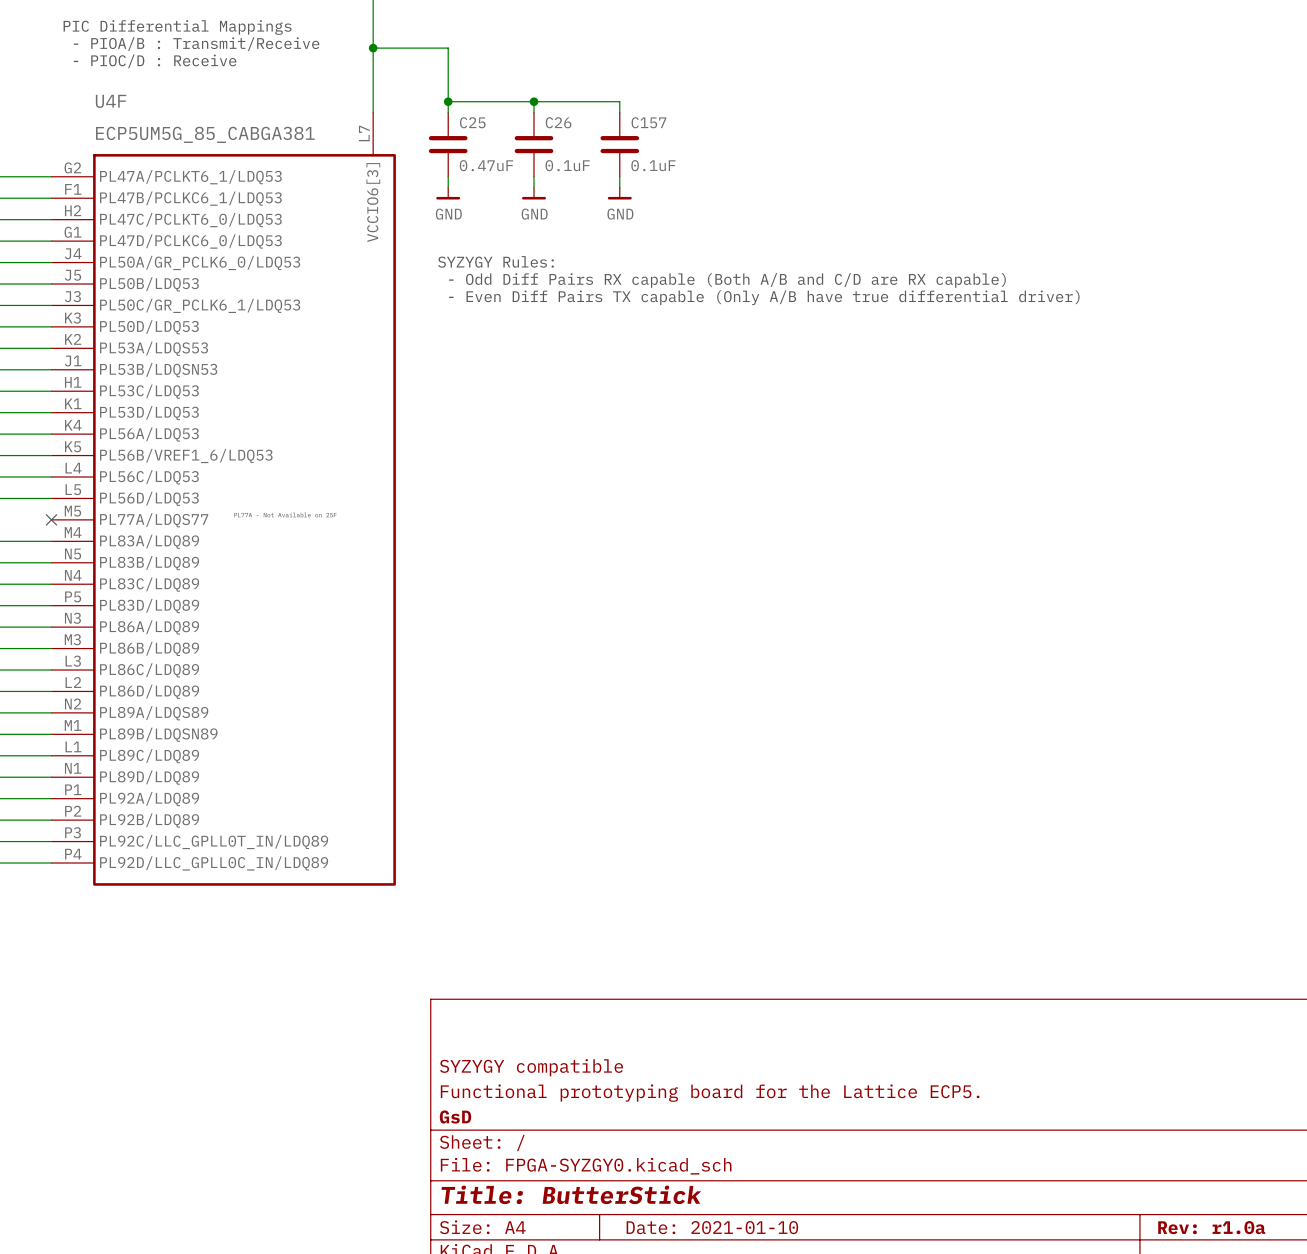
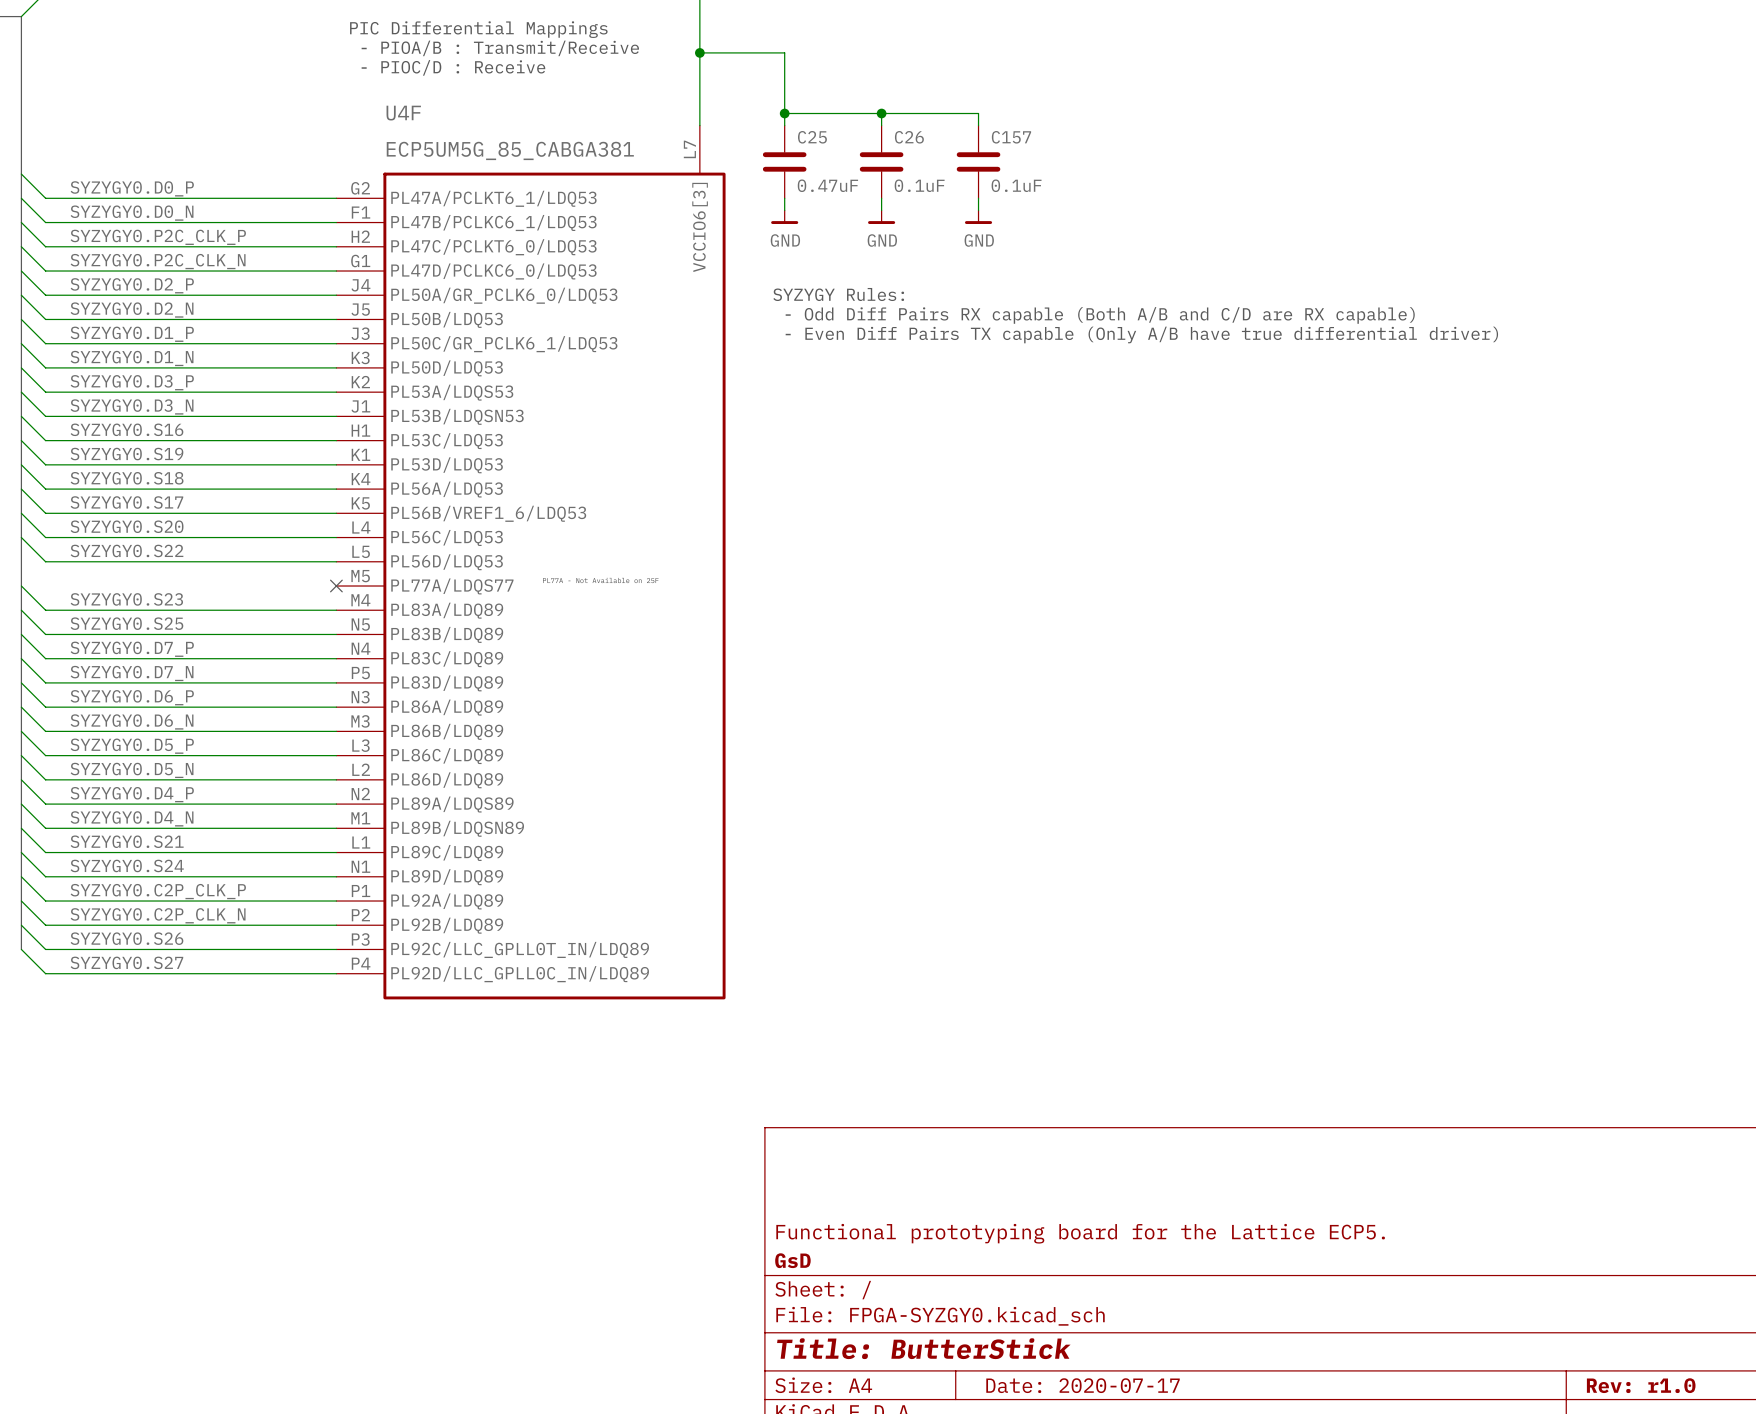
title block: SYZYGY compatible (531, 1067) -> none
title block: Date: 2021-01-10 (712, 1227) -> Date: 2020-07-17 (1083, 1385)
title block: Rev: r1.0a (1211, 1227) -> Rev: r1.0 (1641, 1385)

